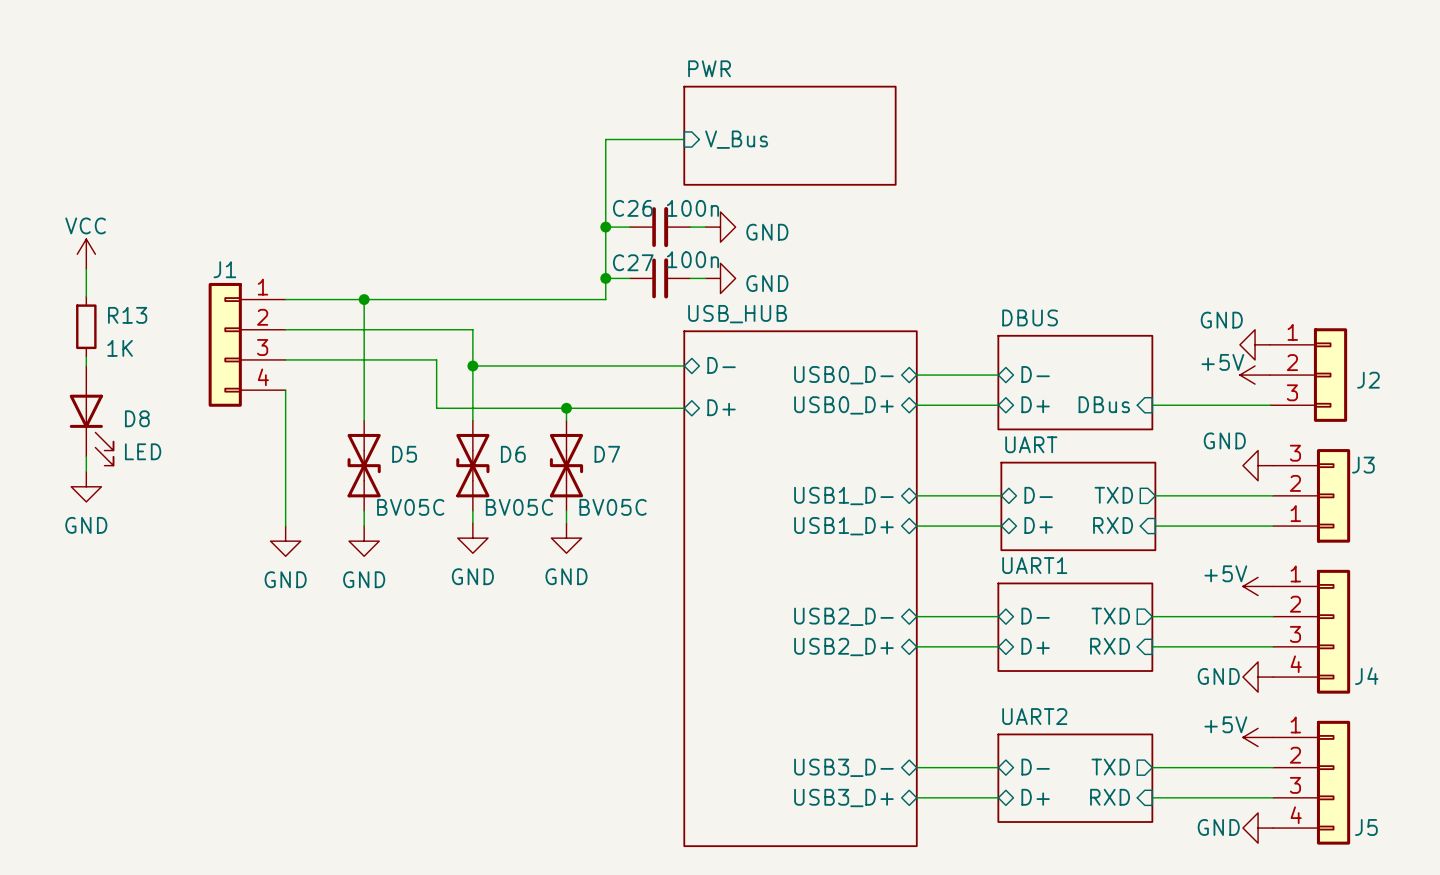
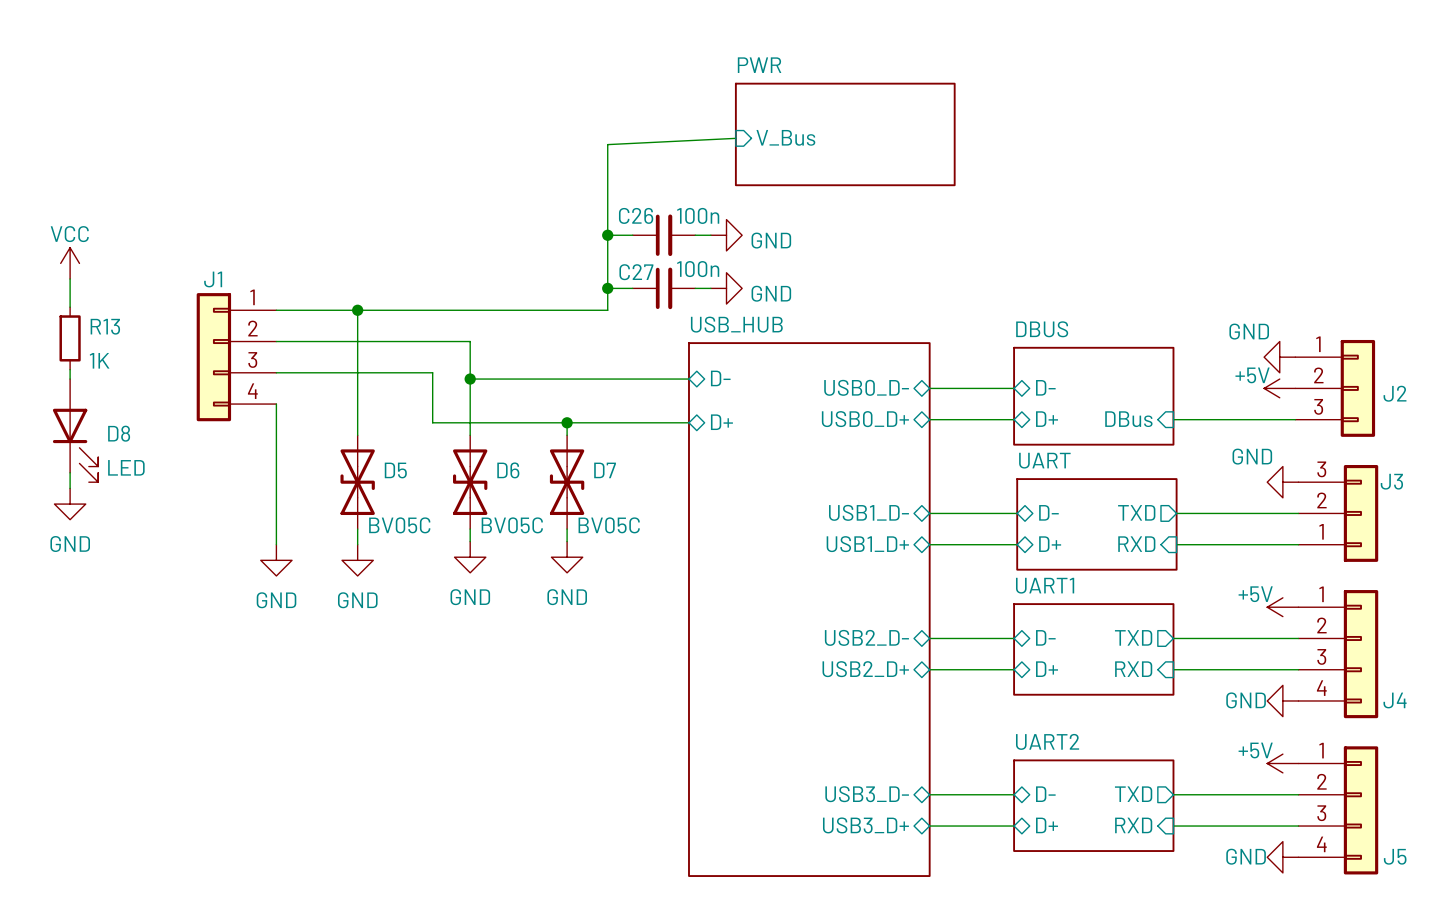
sheet PWR position: (789, 135) -> (845, 134)
wire: (605, 139) (684, 139) -> (607, 144) (735, 138)
sheet pin position: V_Bus (736, 139) -> V_Bus (785, 137)

